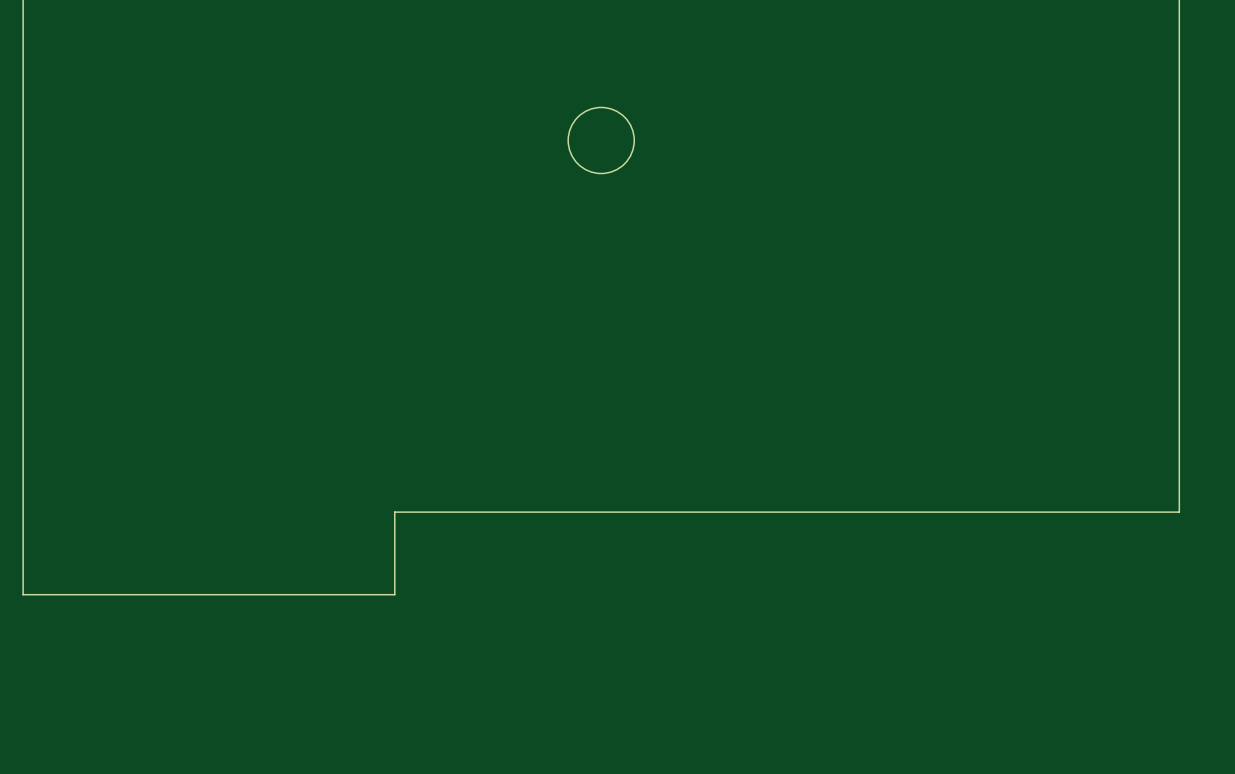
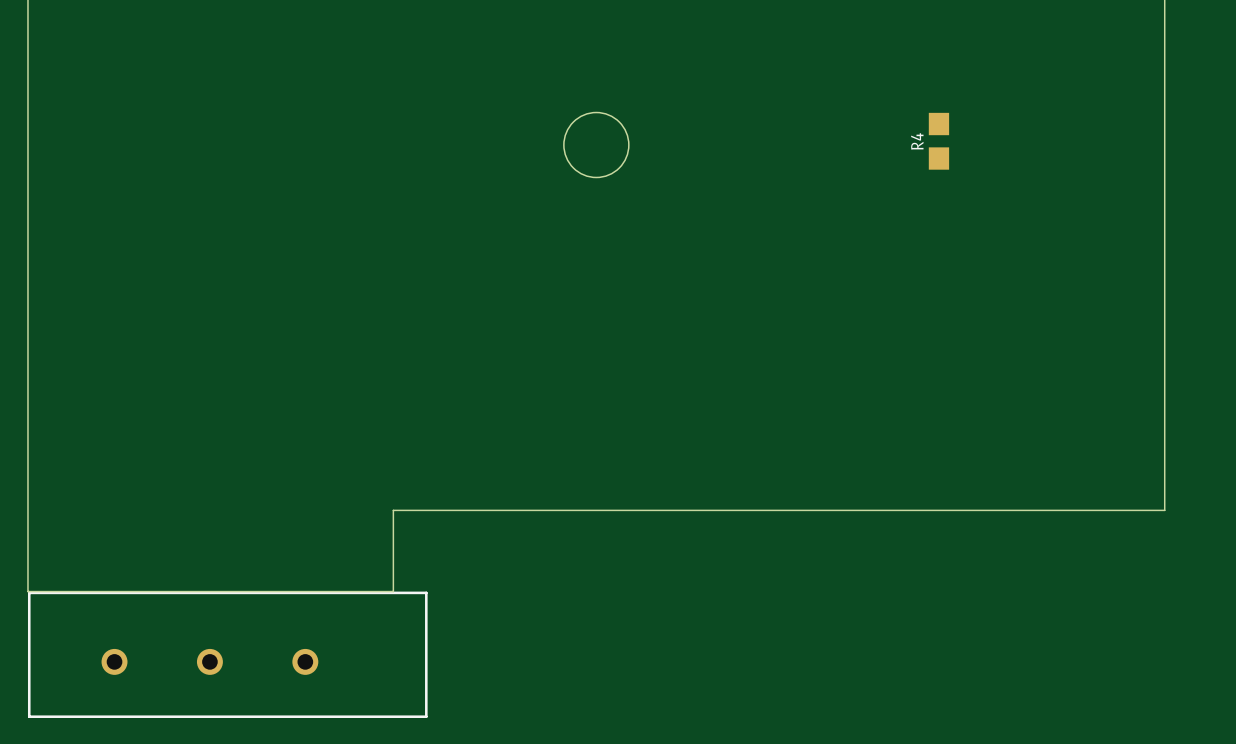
R4: none -> (938, 141)
part: none -> (227, 654)

